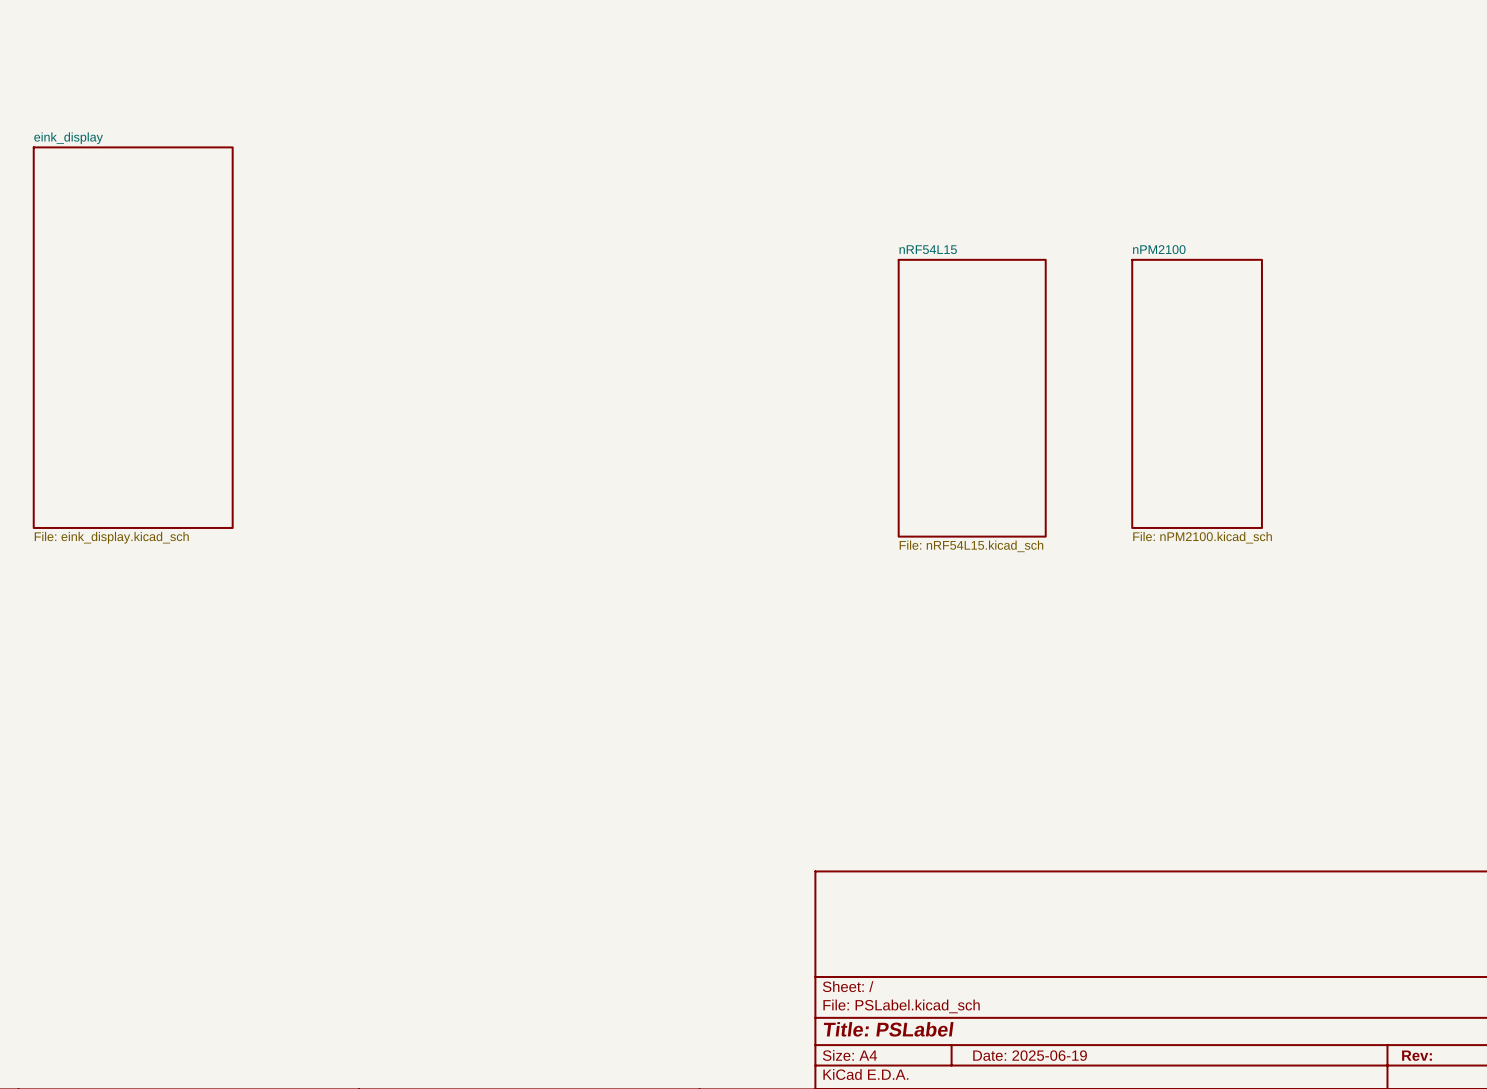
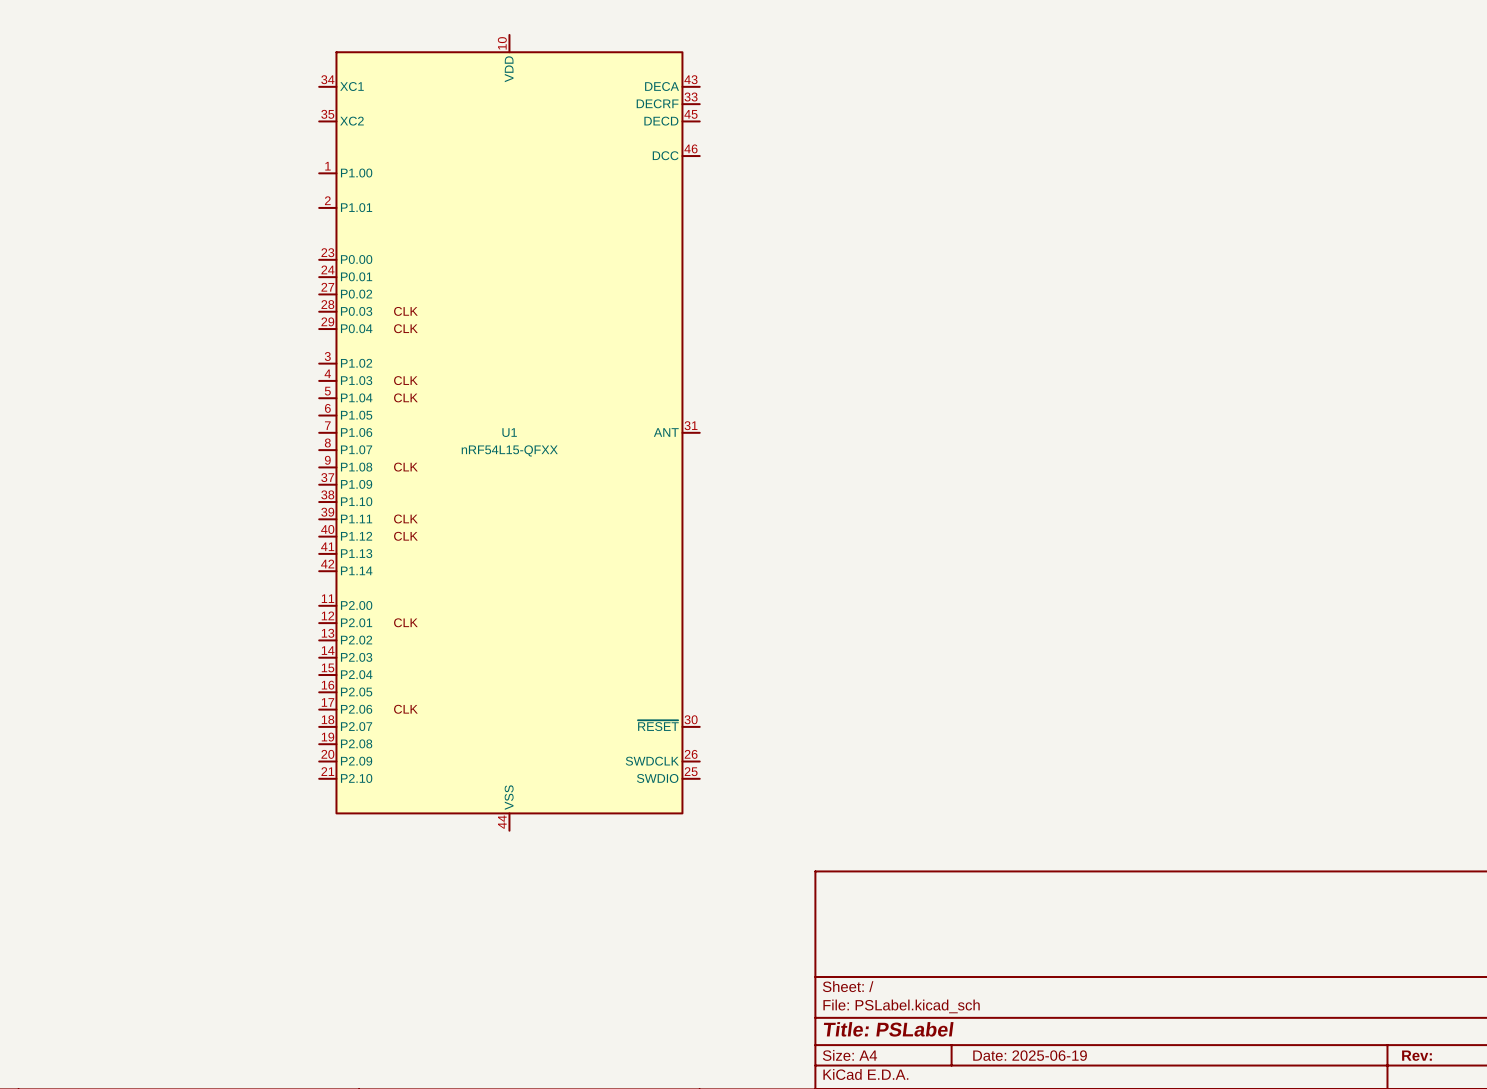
sheet eink_display: File: eink_display.kicad_sch (133, 337) -> none
sheet nPM2100: File: nPM2100.kicad_sch (1197, 393) -> none
sheet nRF54L15: File: nRF54L15.kicad_sch (972, 398) -> none
U1: none -> nRF54L15-QFXX (509, 432)

